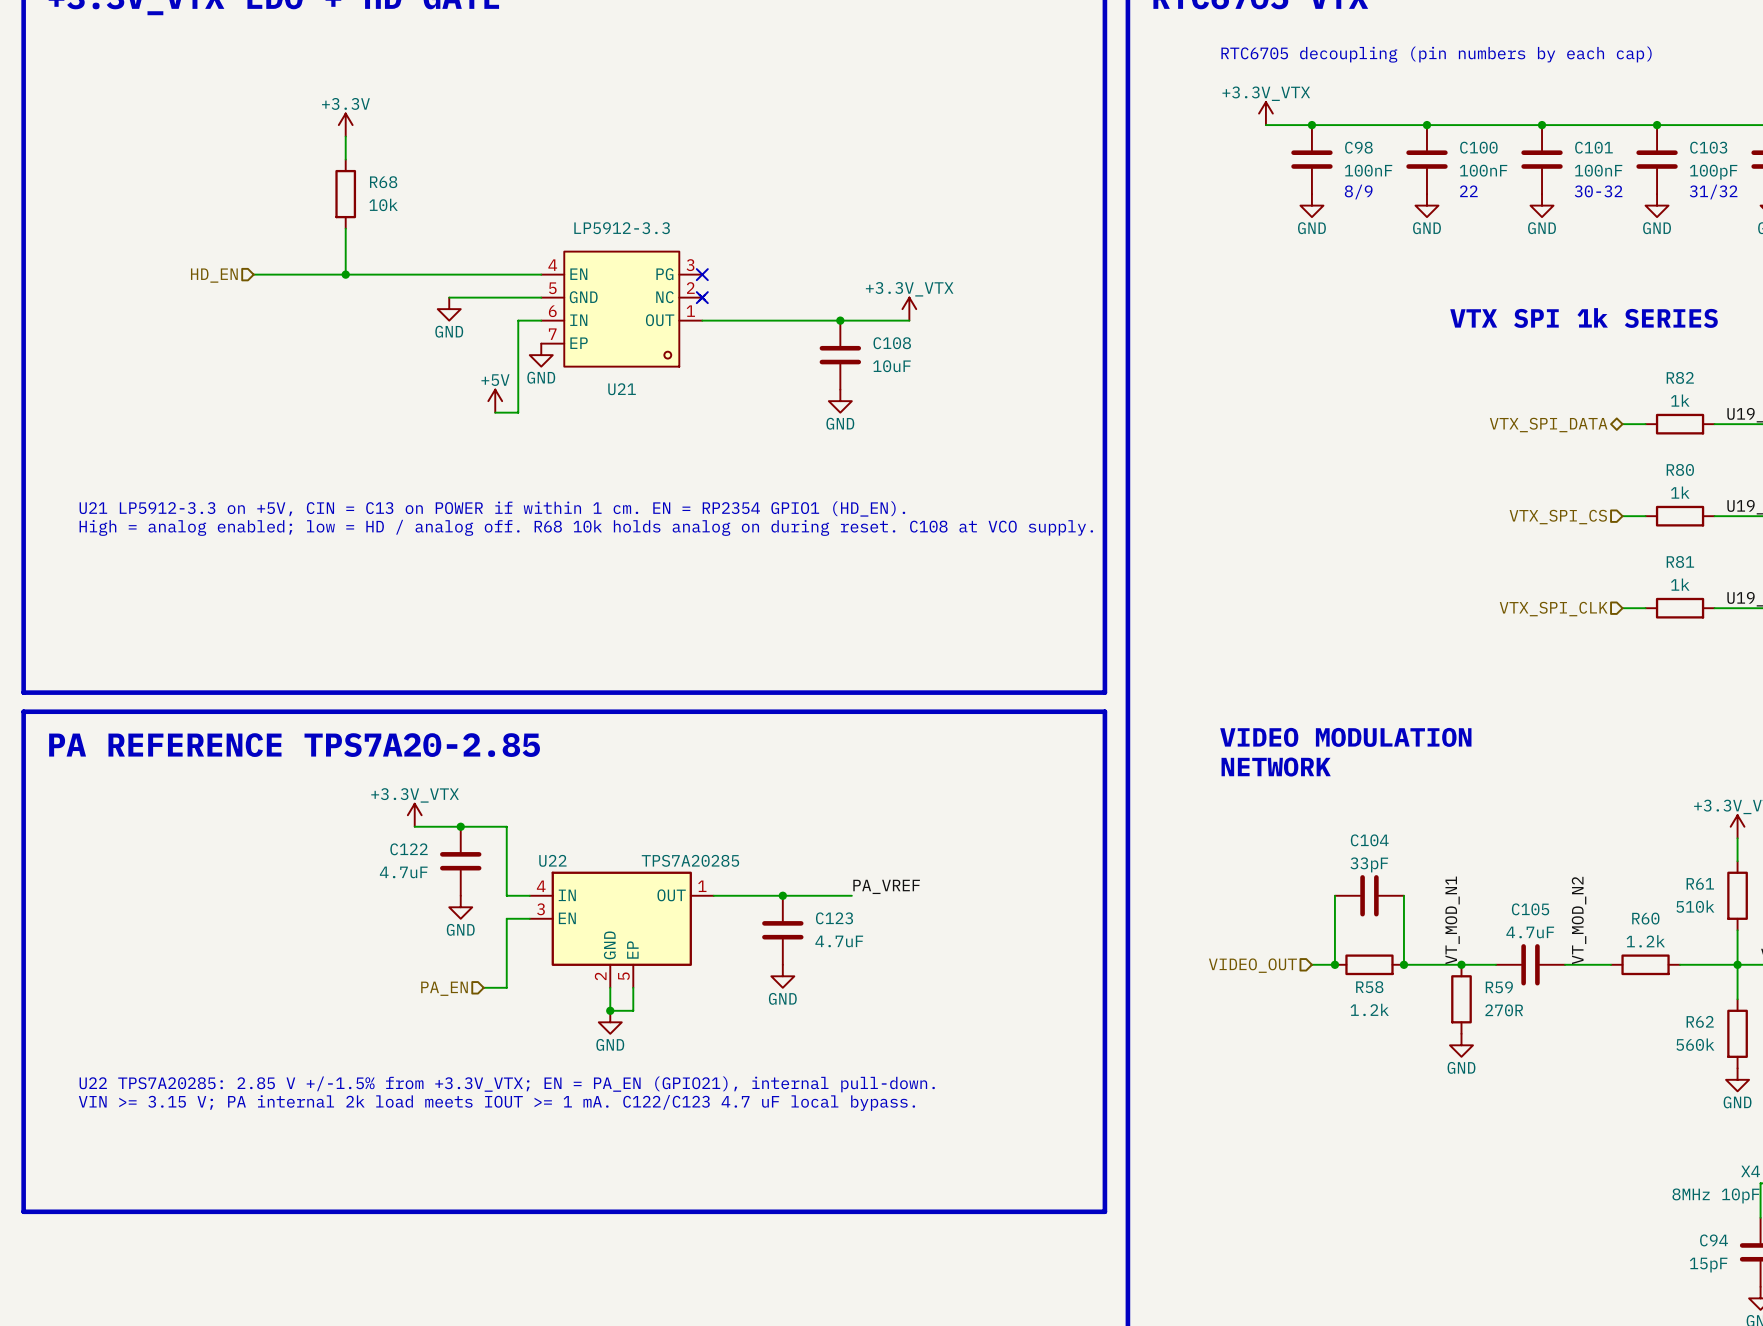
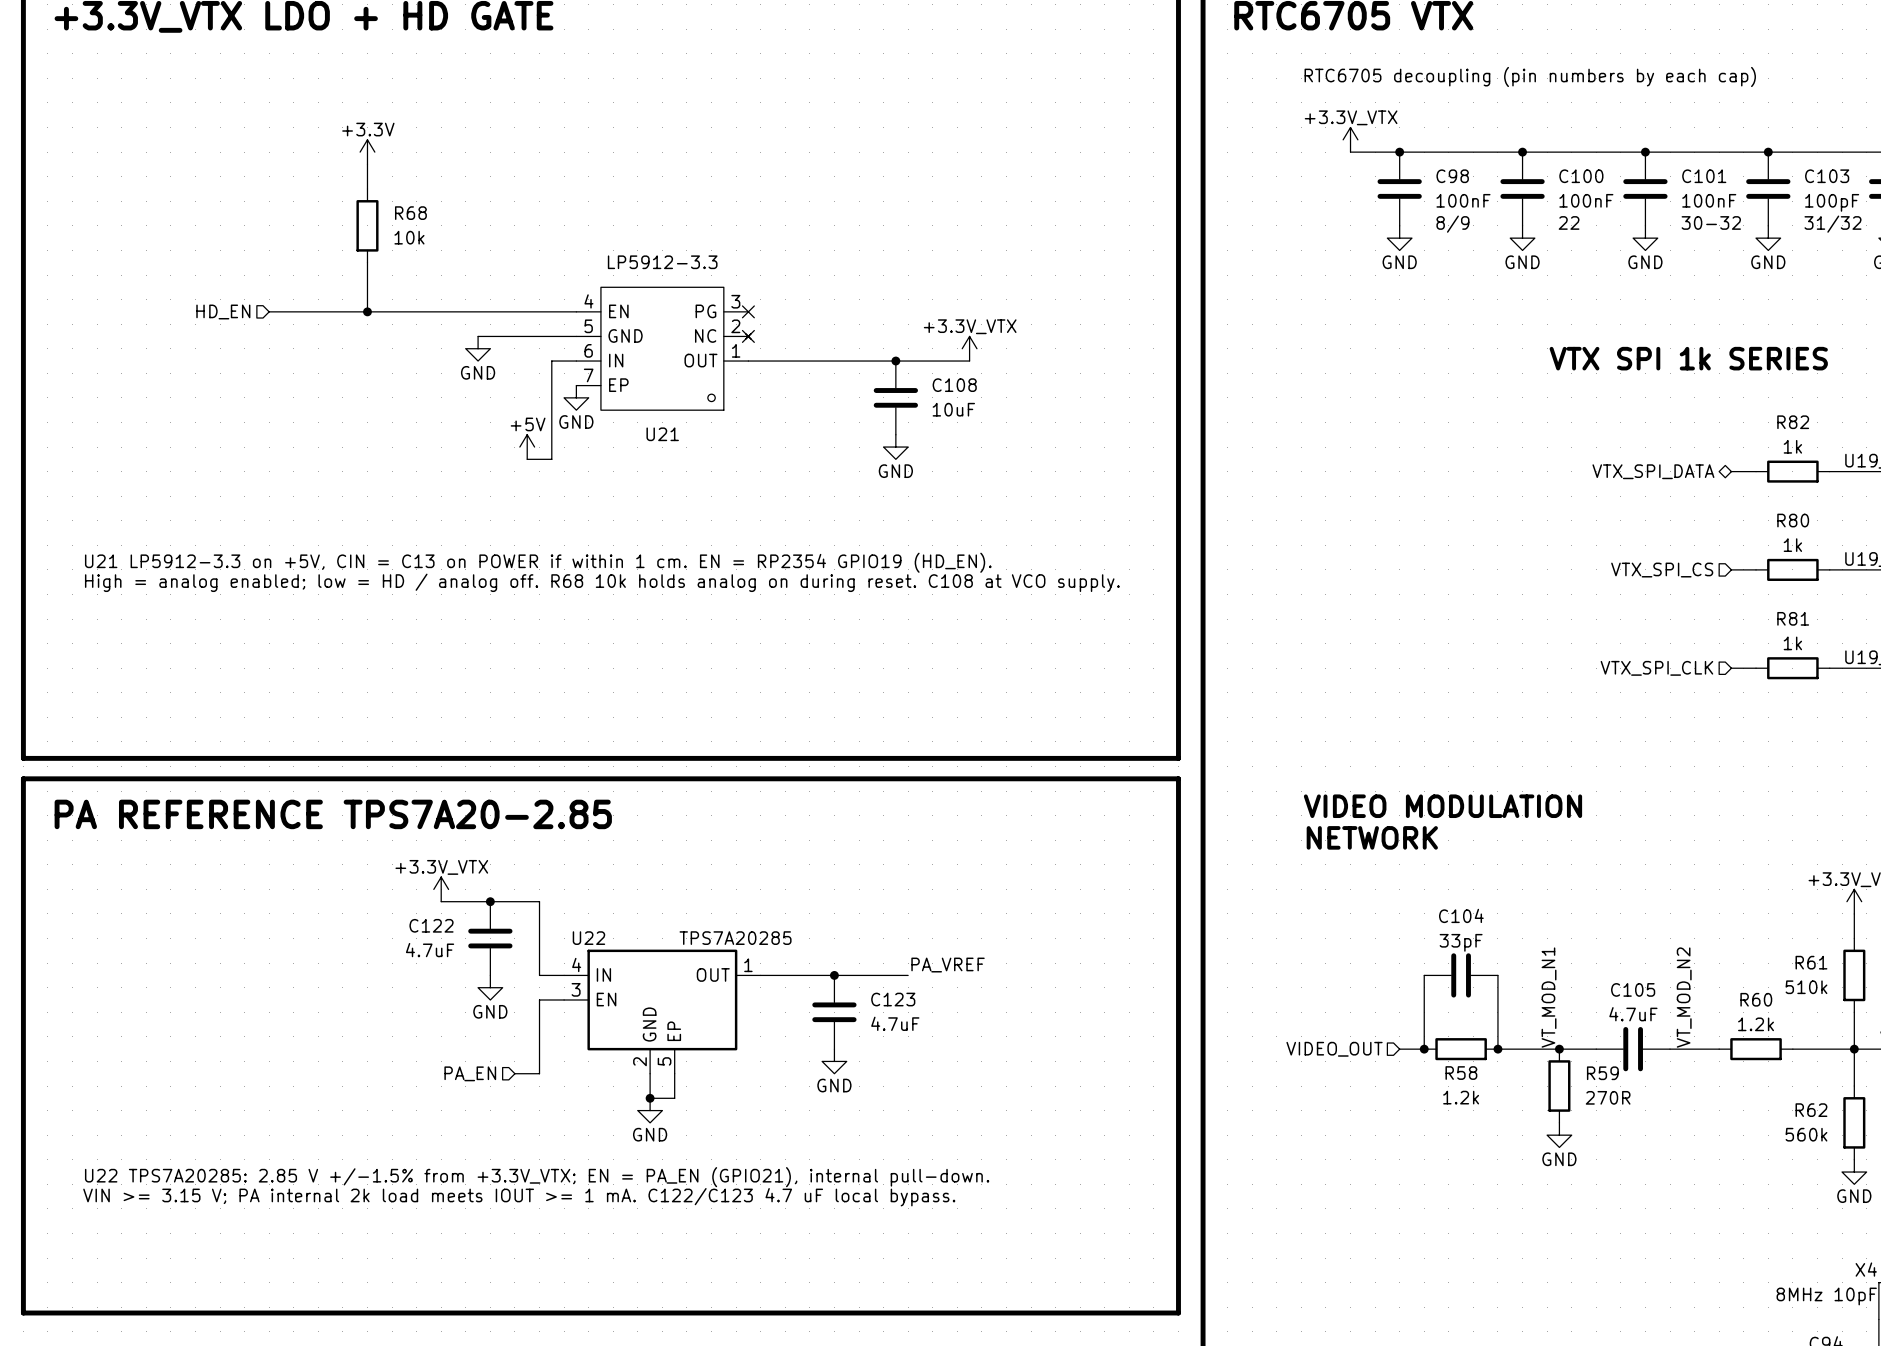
text: U21 LP5912-3.3 on +5V, CIN = C13 on POWER if within 1 cm. EN = RP2354 GPIO1 (HD_EN). (492, 508) -> U21 LP5912-3.3 on +5V, CIN = C13 on POWER if within 1 cm. EN = RP2354 GPIO19 (HD_EN). (538, 562)

